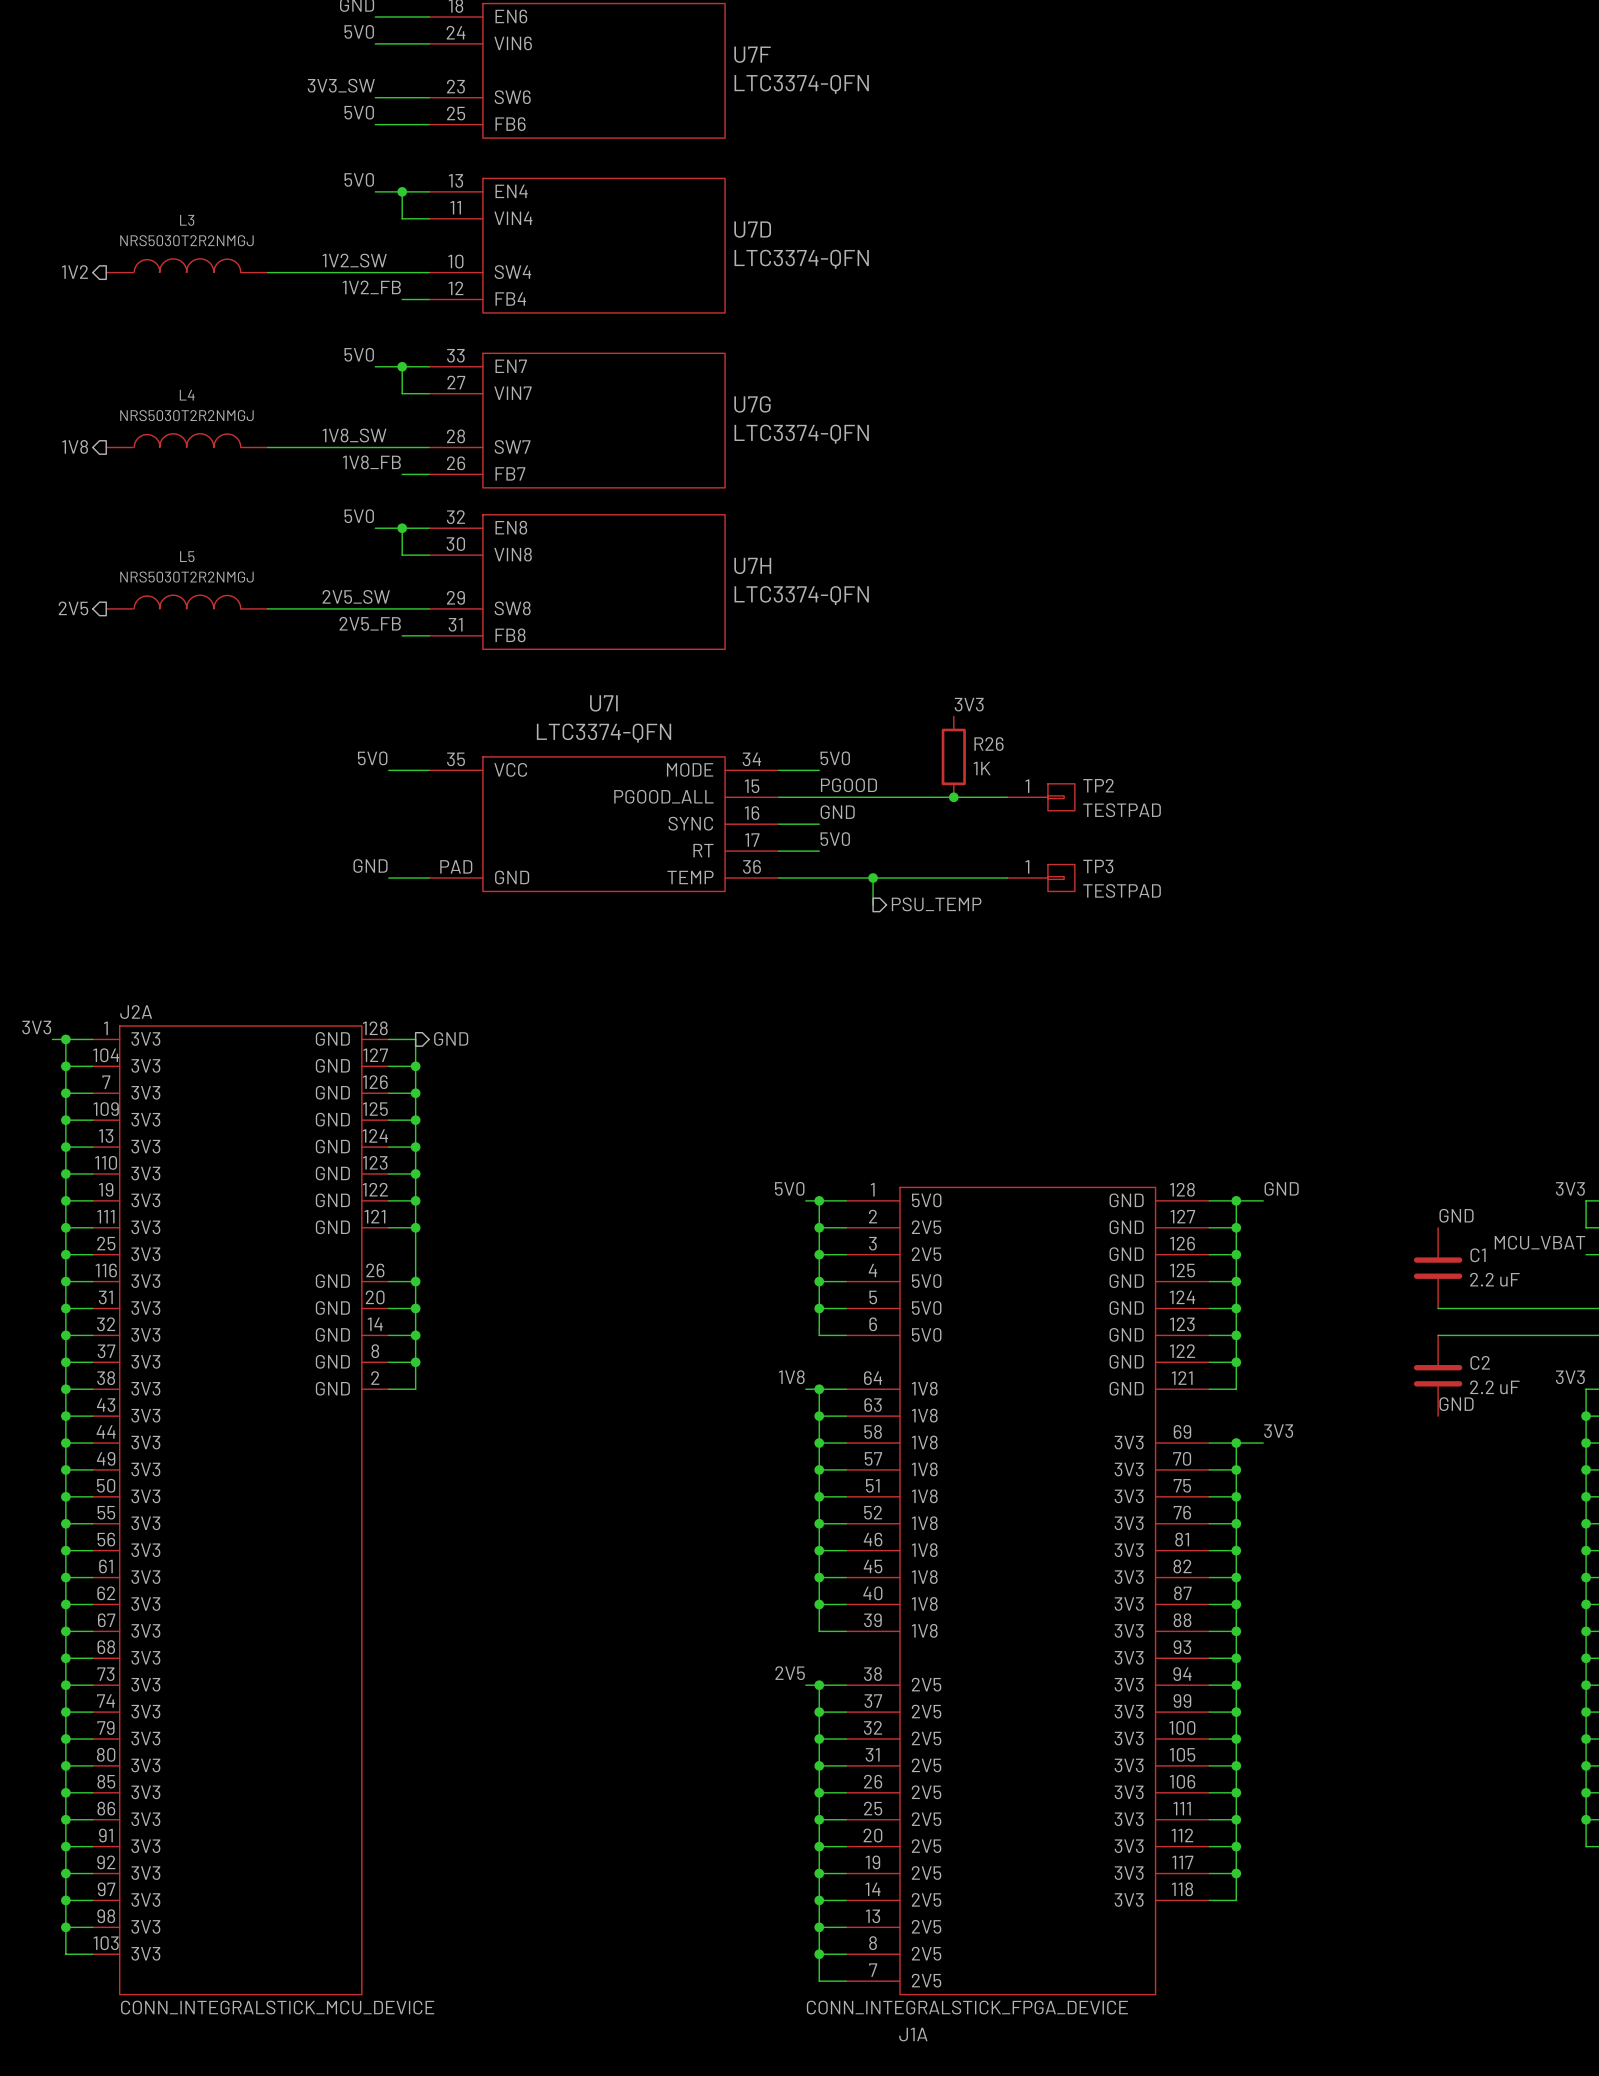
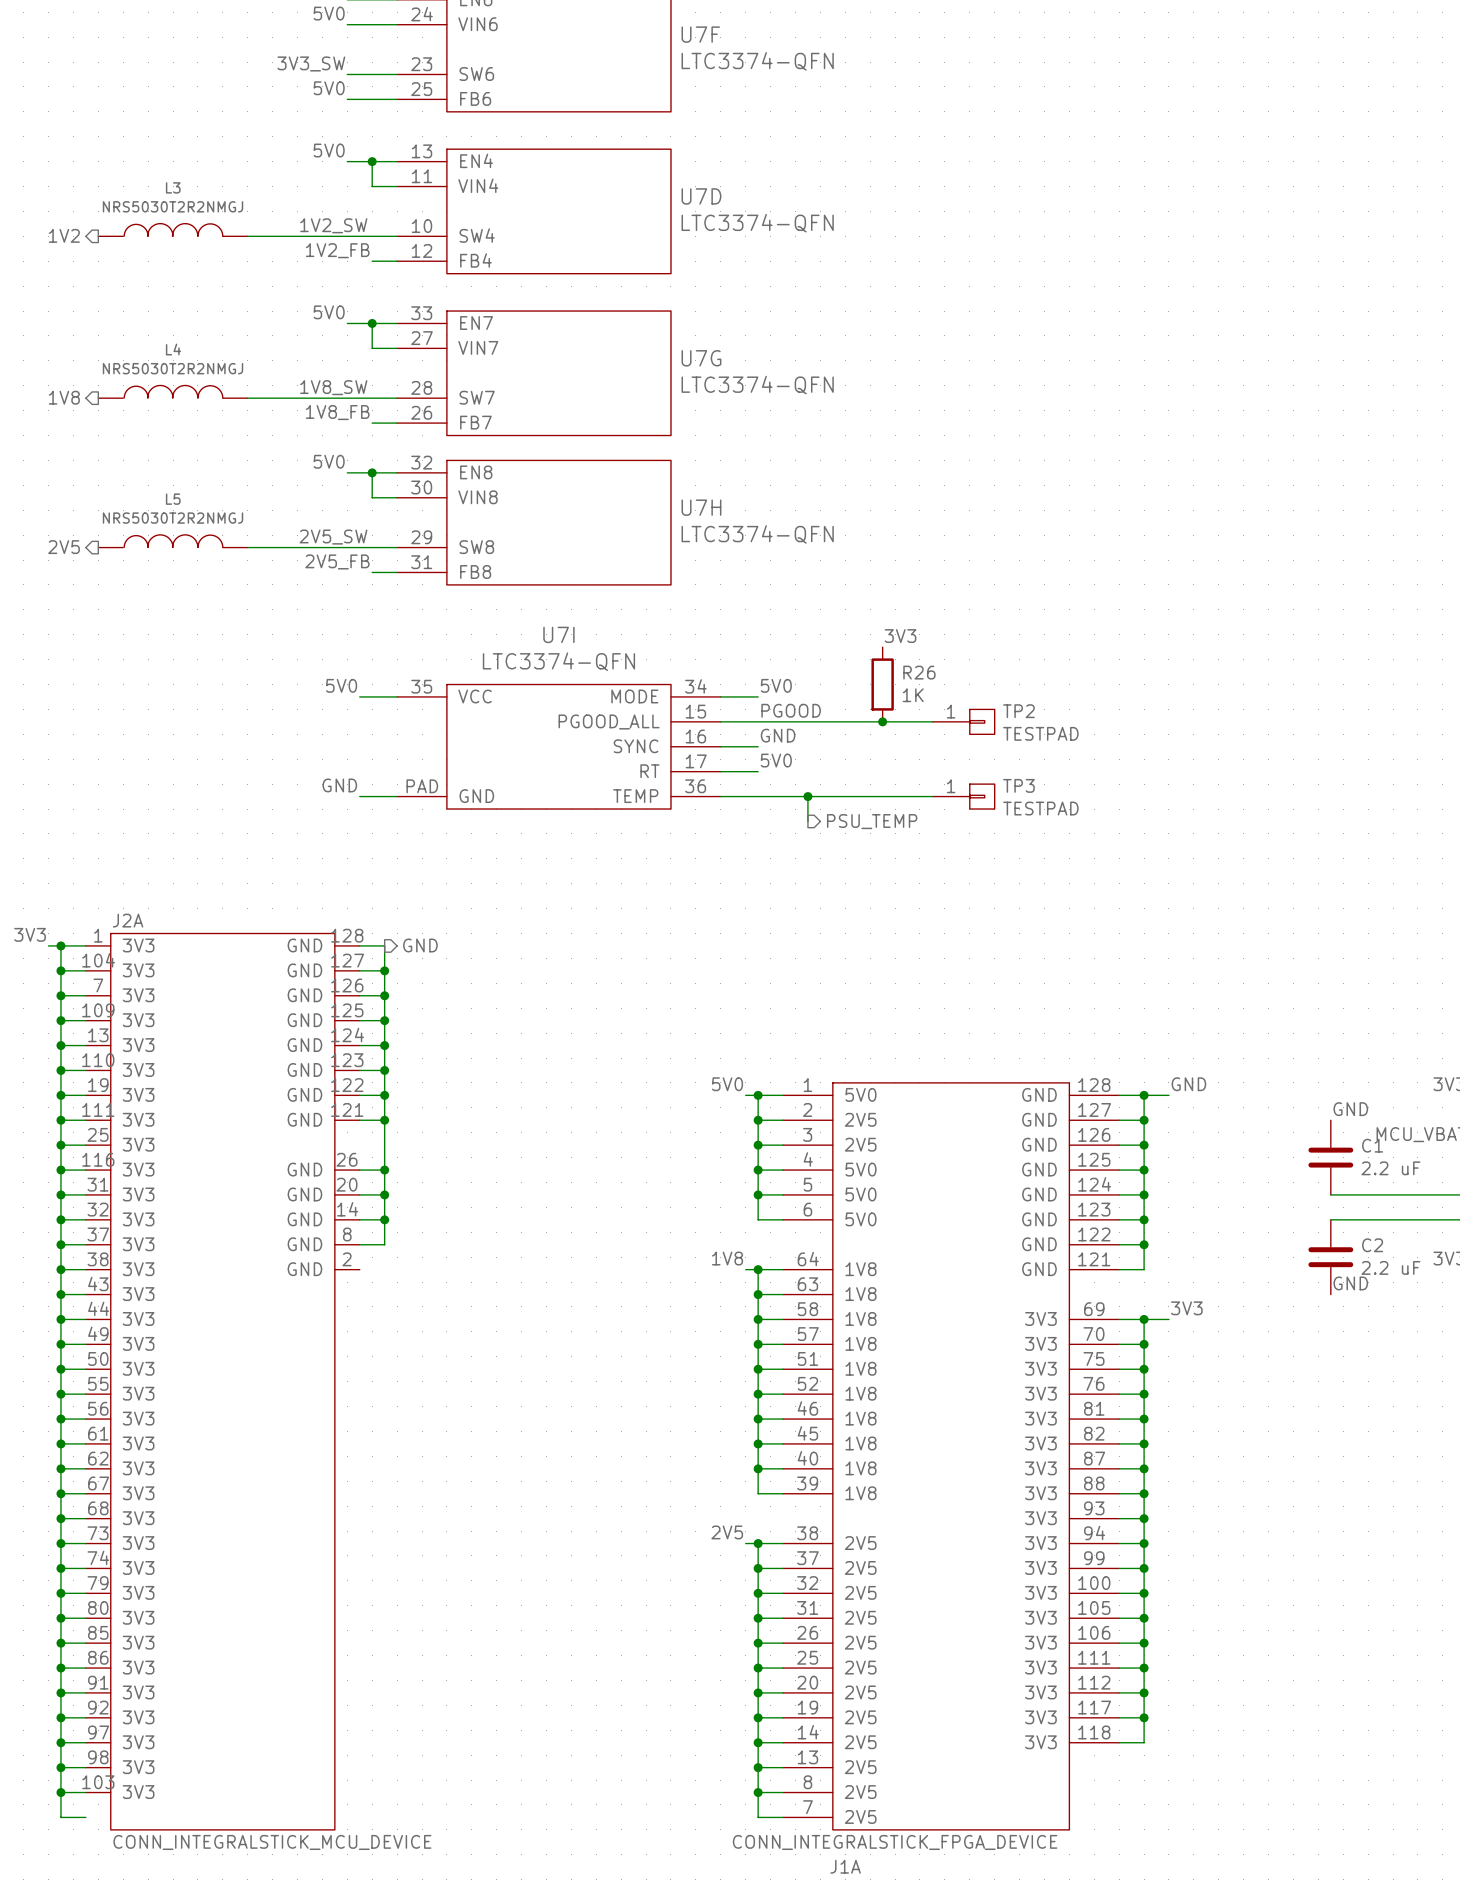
wire: (415, 1362) (415, 1389) (388, 1389) -> none
junction: (415, 1362) -> none
wire: none -> (60, 1792) (60, 1817) (85, 1817)
junction: none -> (60, 1792)

